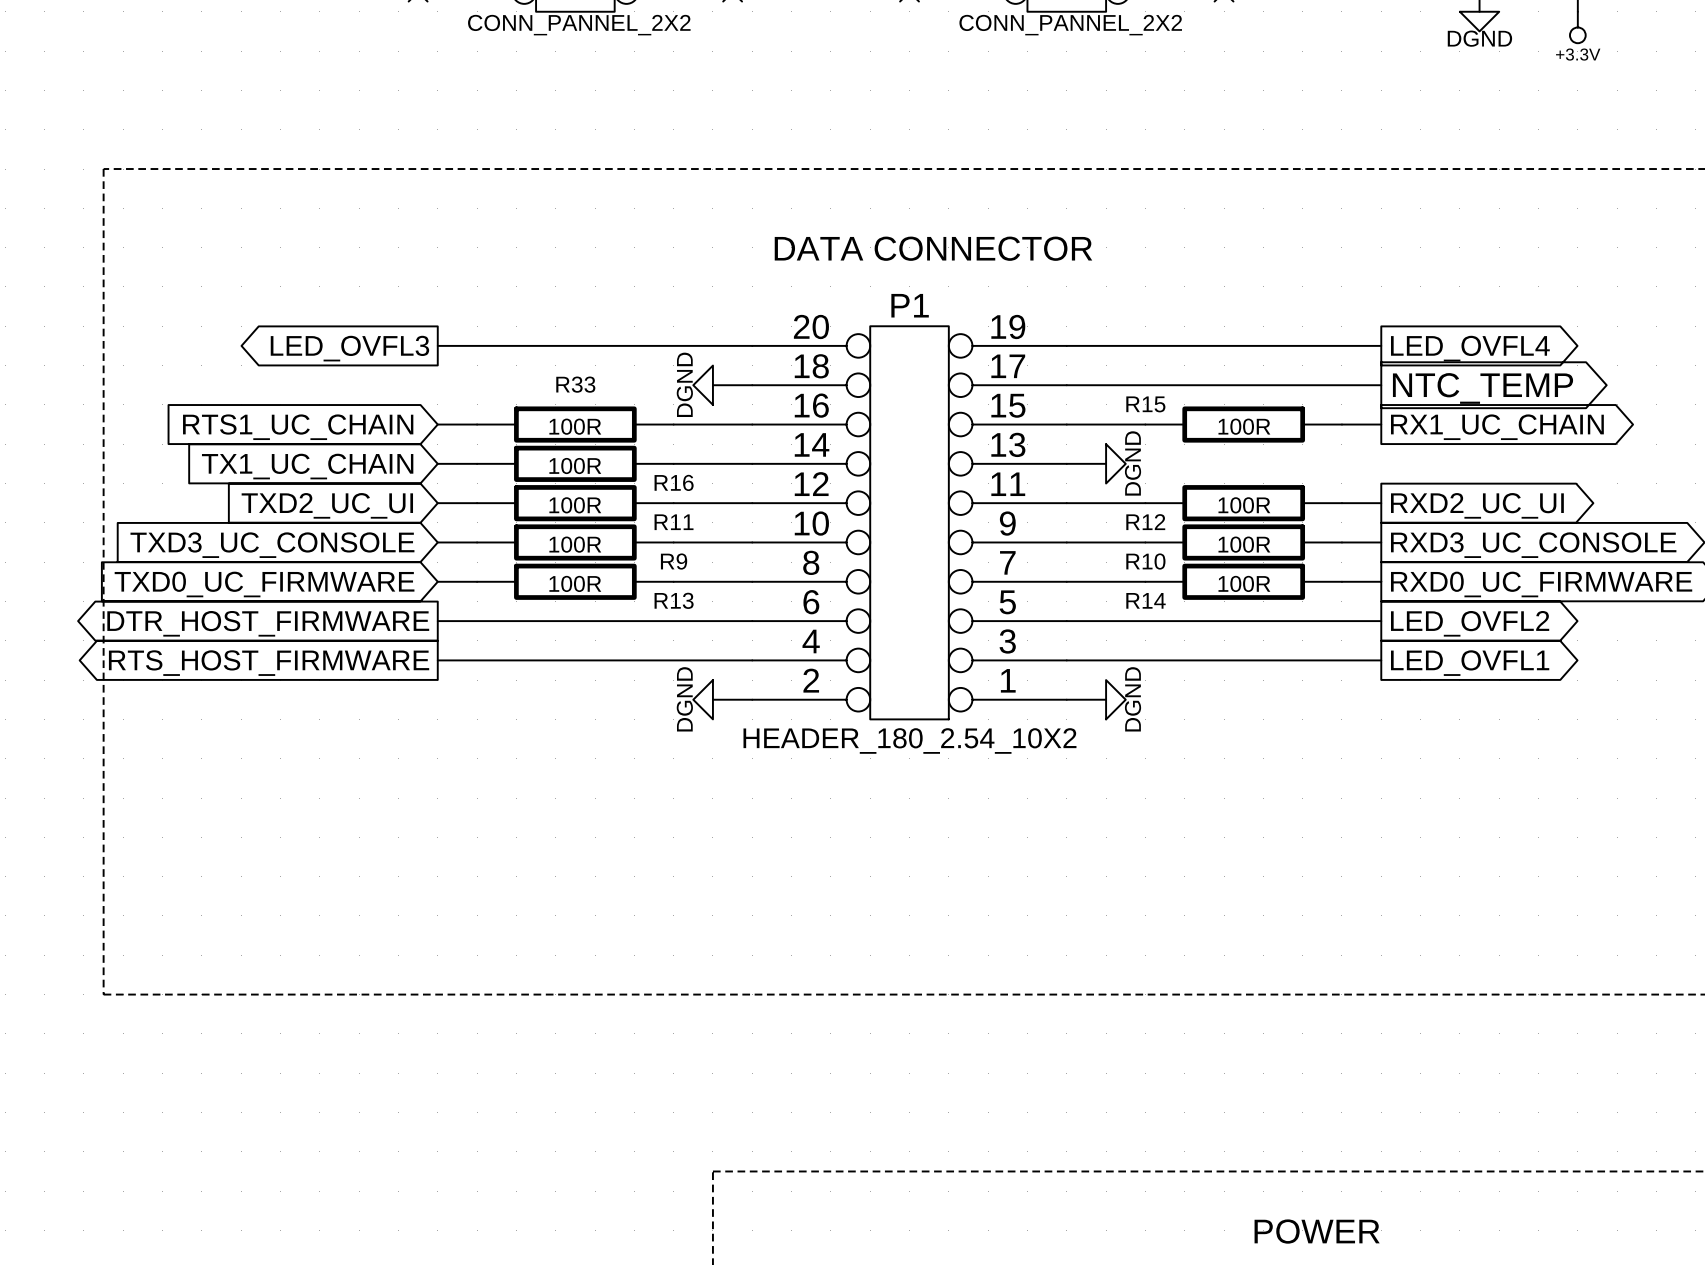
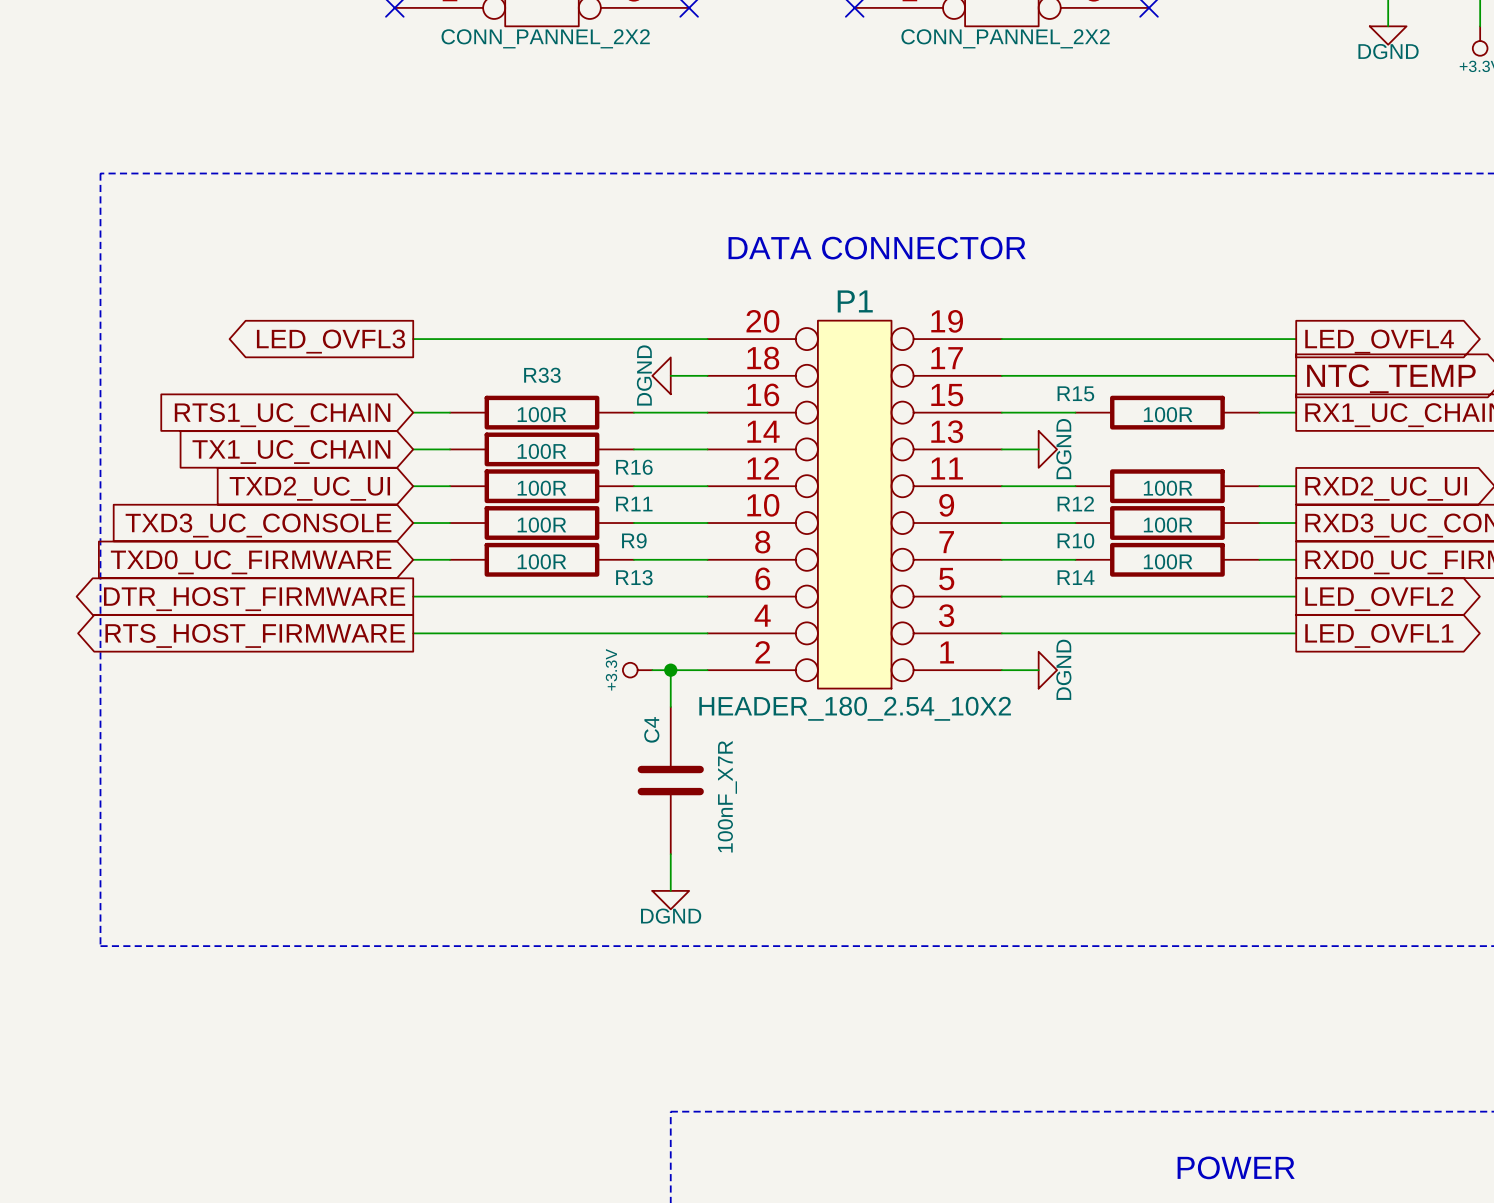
power symbol: none -> +3.3V (637, 670)
wire: none -> (652, 670) (670, 670) (670, 706)
power symbol rotation: 0° (703, 699) -> 90° counterclockwise (670, 900)
power symbol position: DGND (703, 699) -> DGND (670, 900)
junction: none -> (670, 670)
C4: none -> 100nF_X7R (670, 780)
wire: none -> (670, 854) (670, 890)

